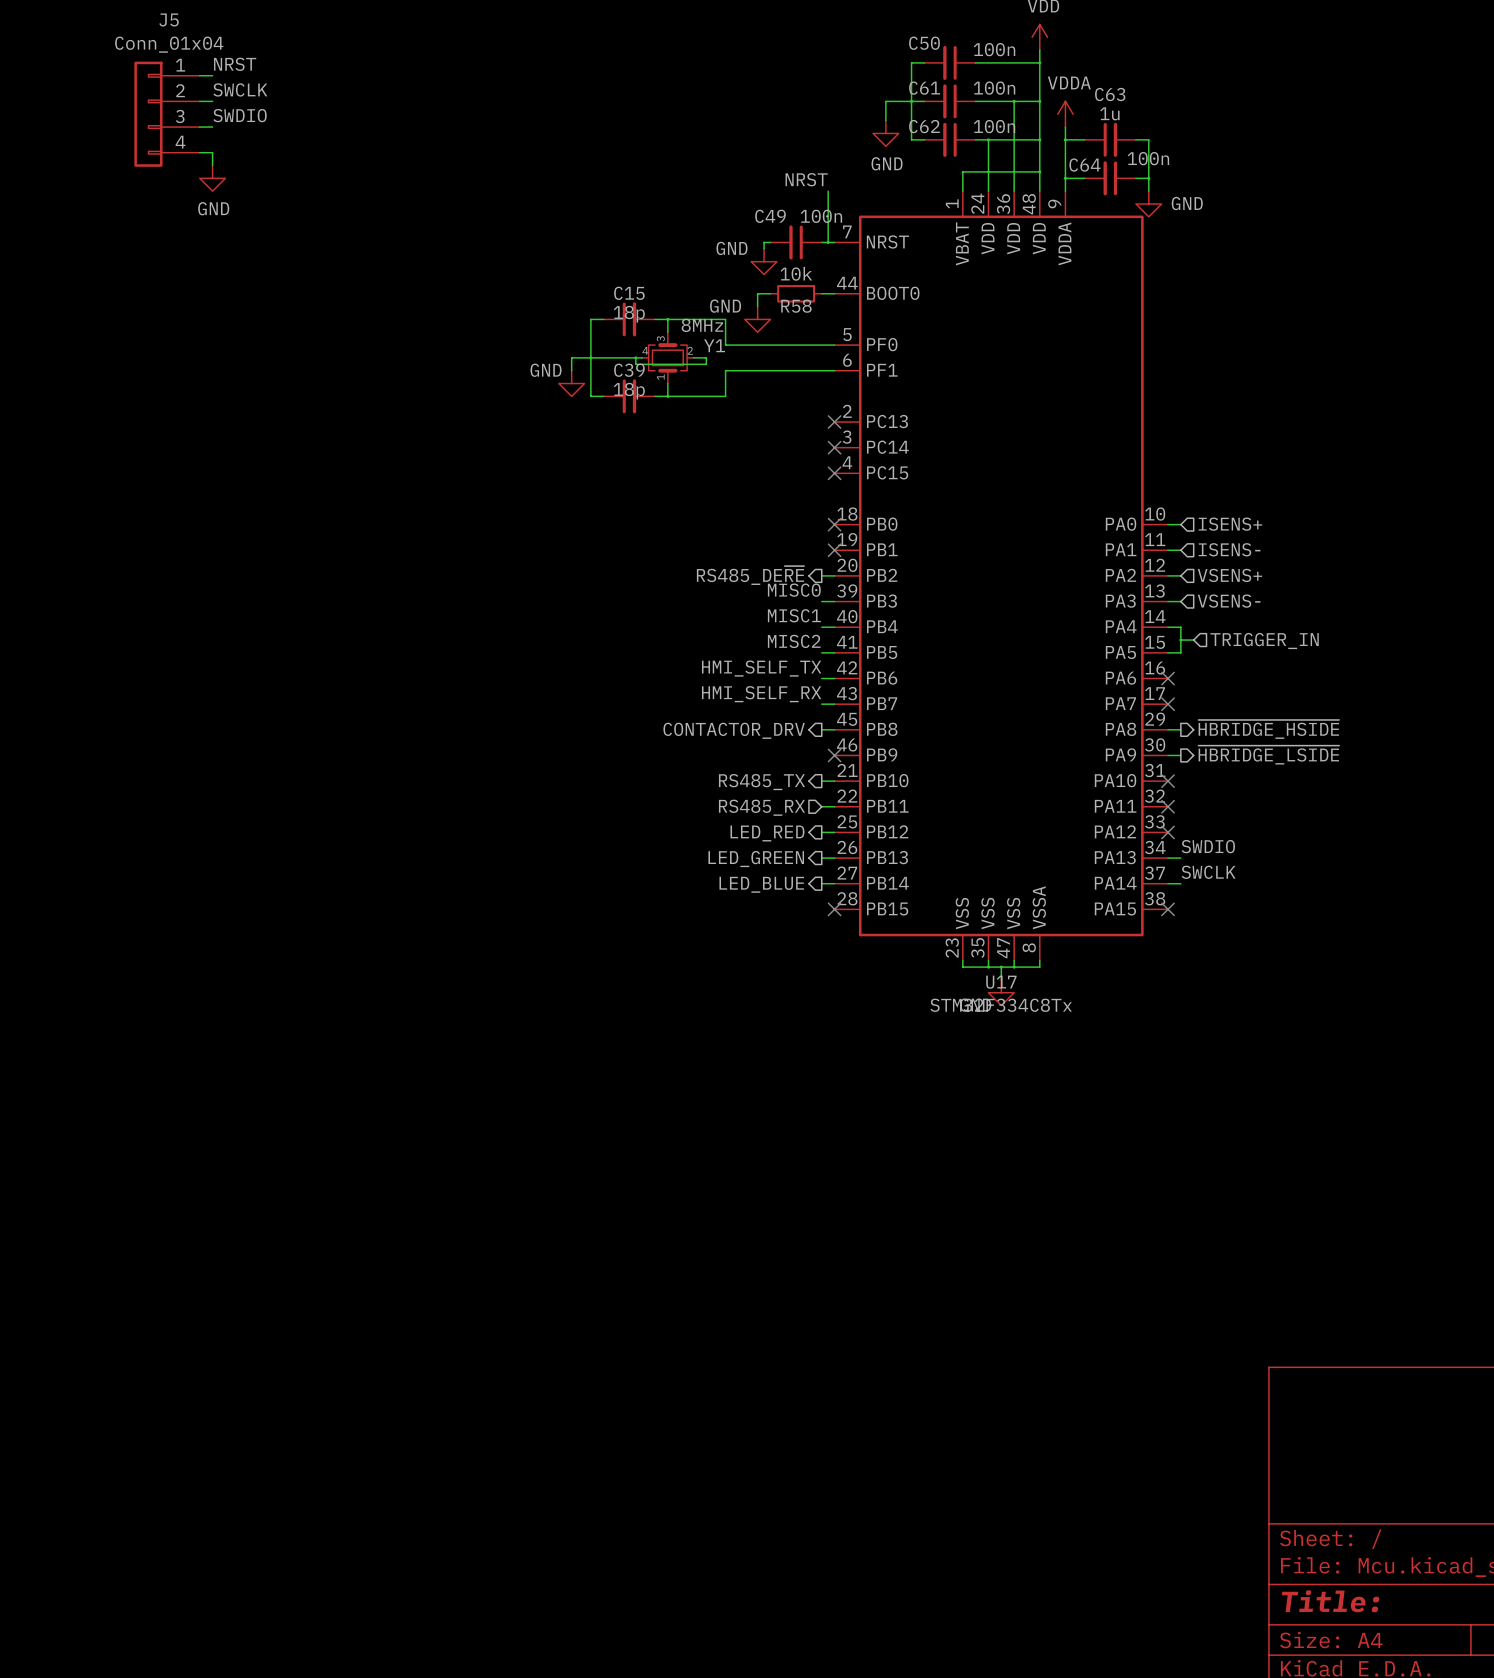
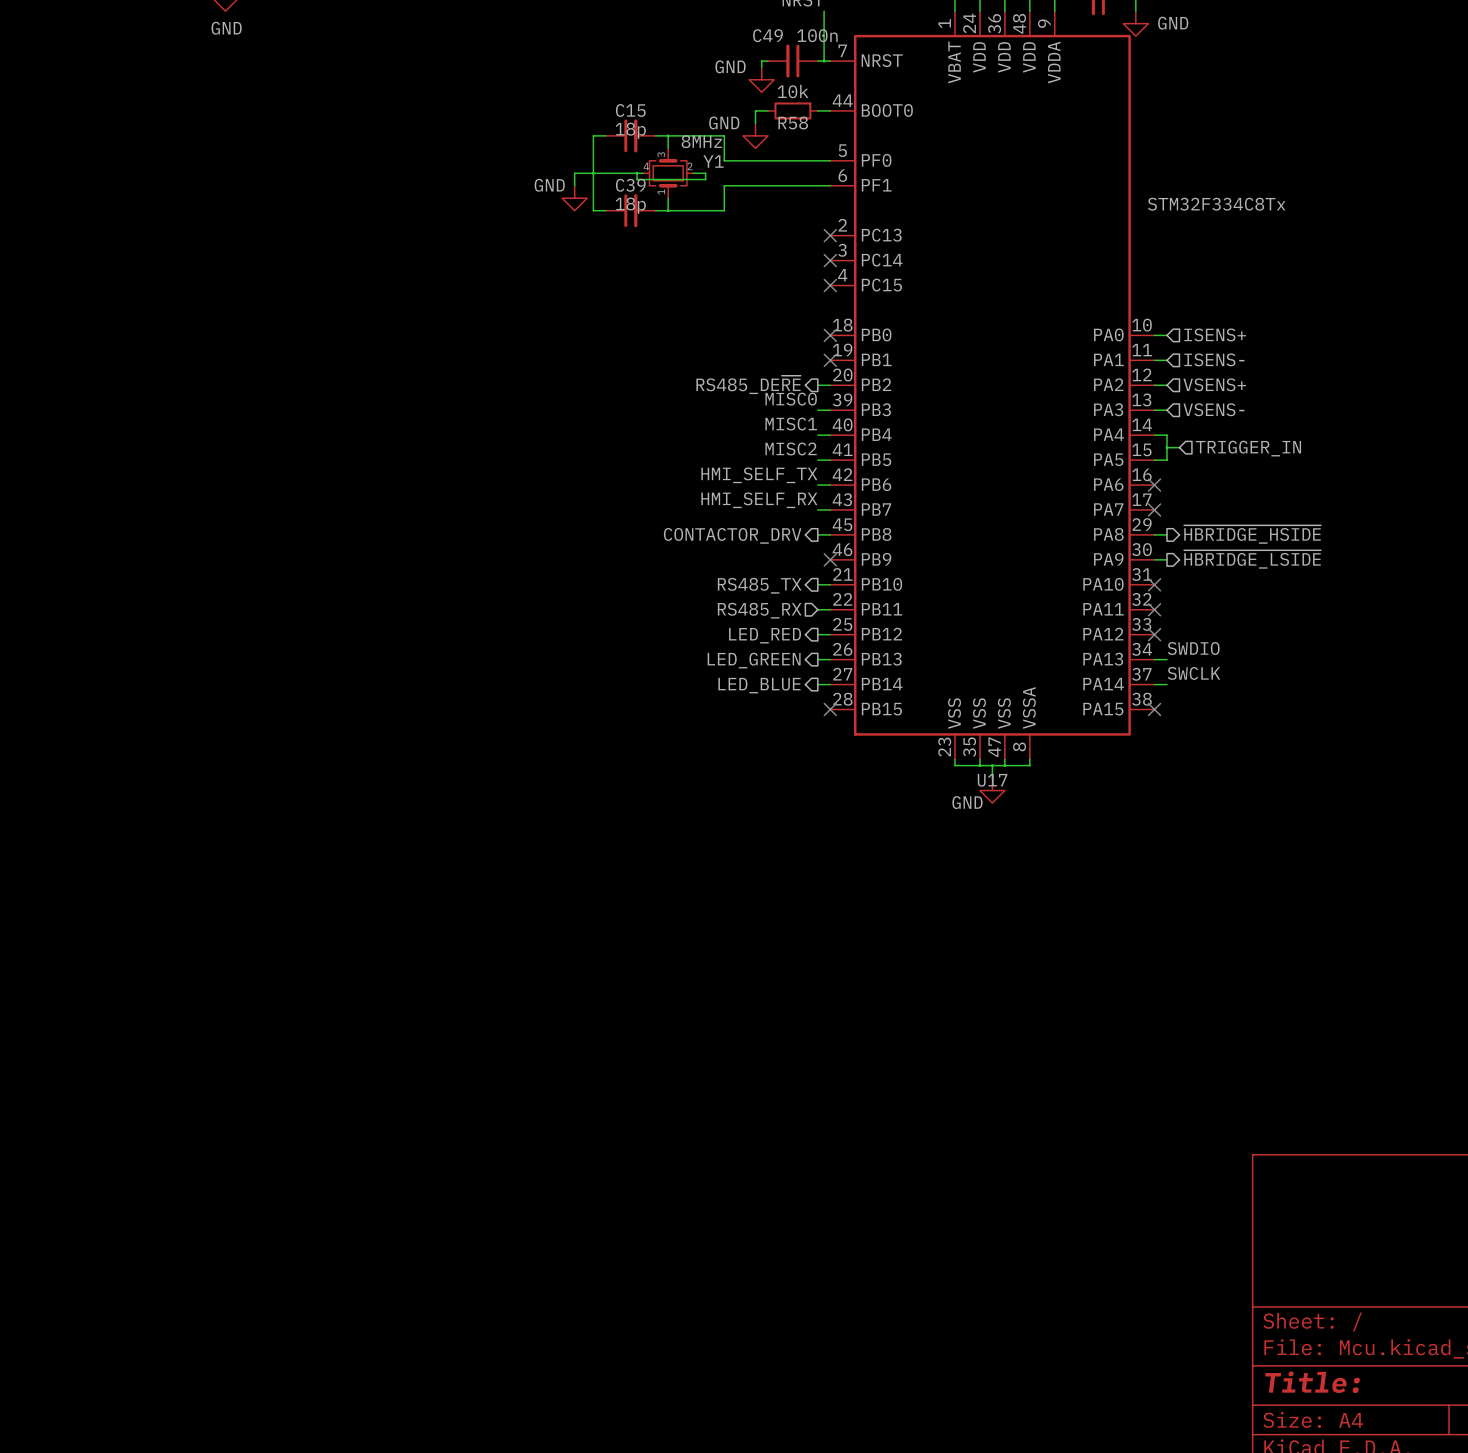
U17 value position: STM32F334C8Tx (1001, 1005) -> STM32F334C8Tx (1216, 204)

